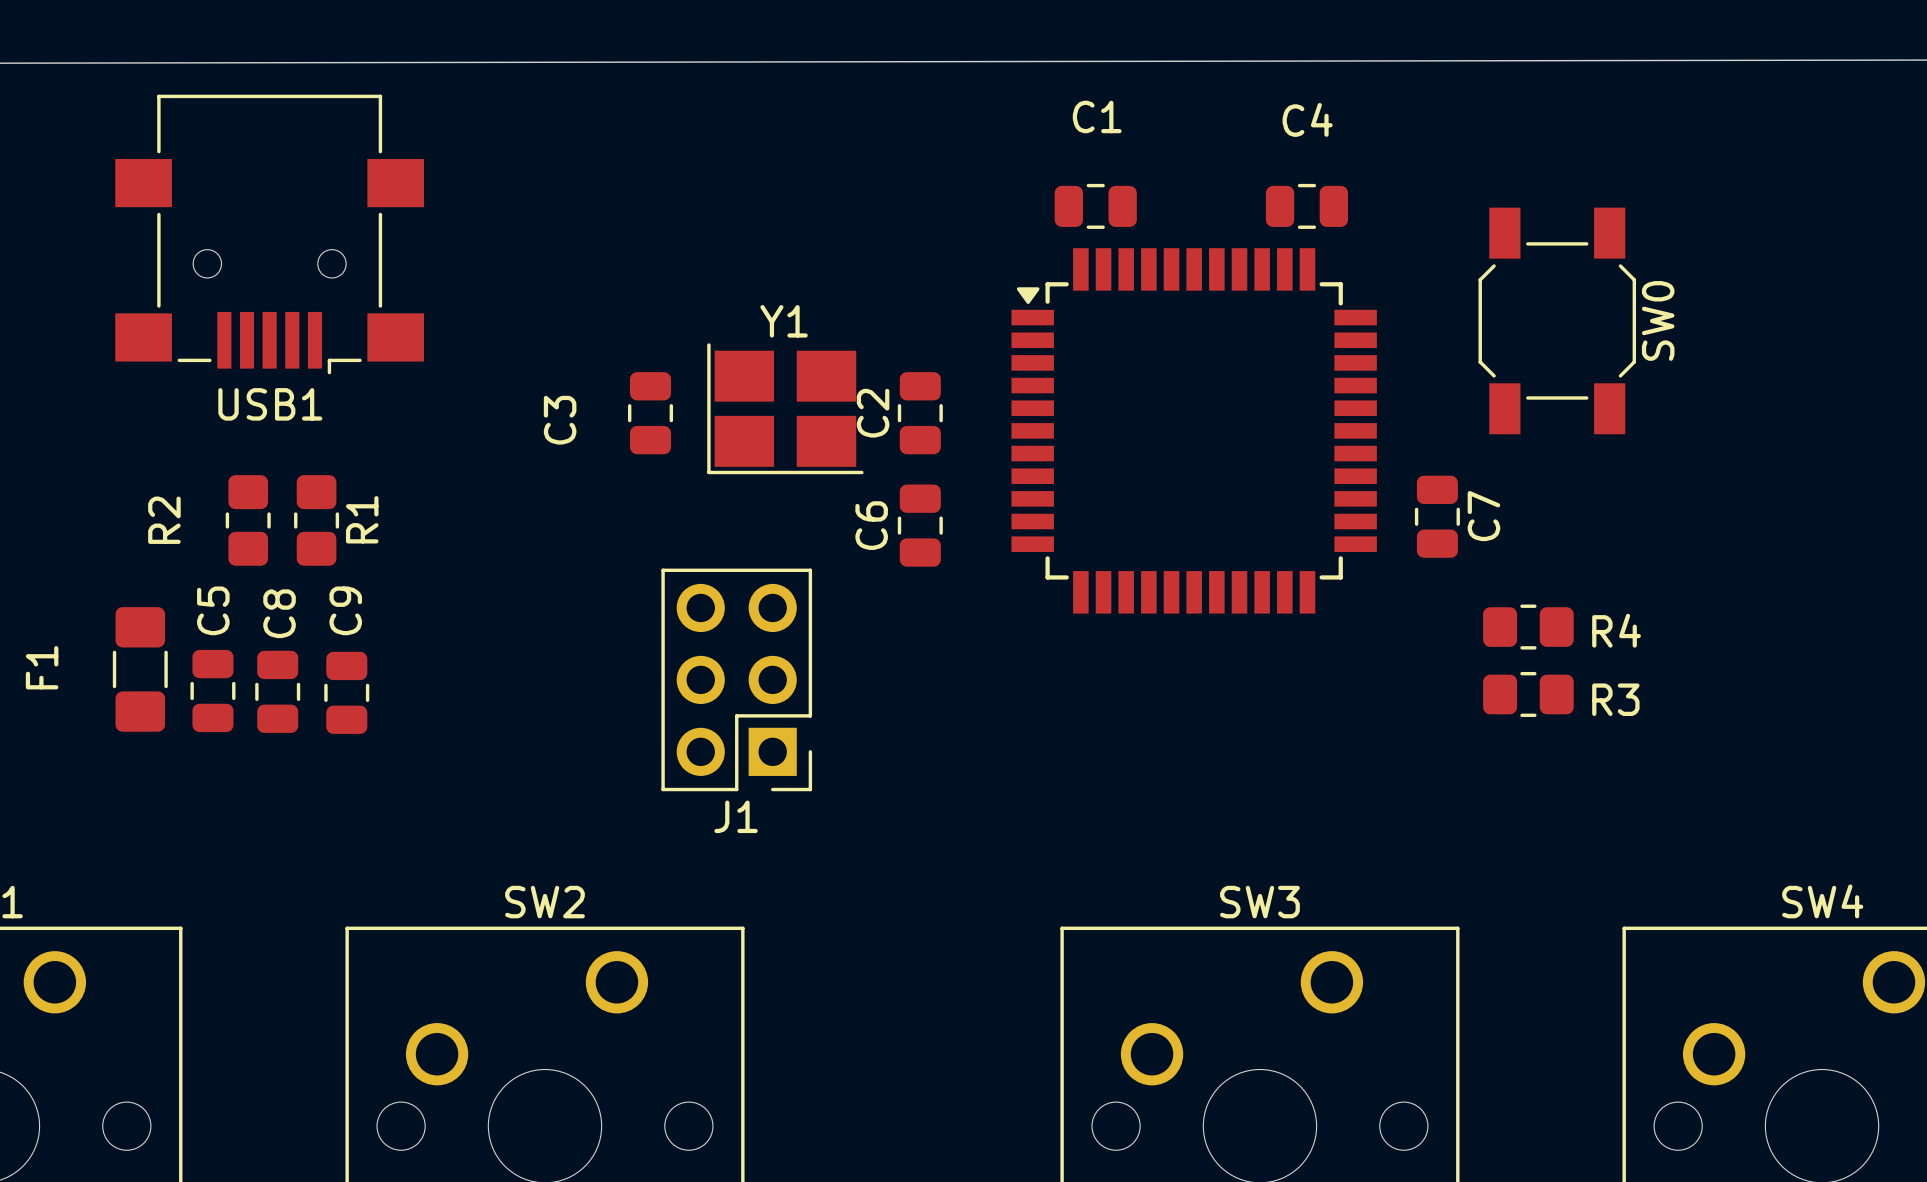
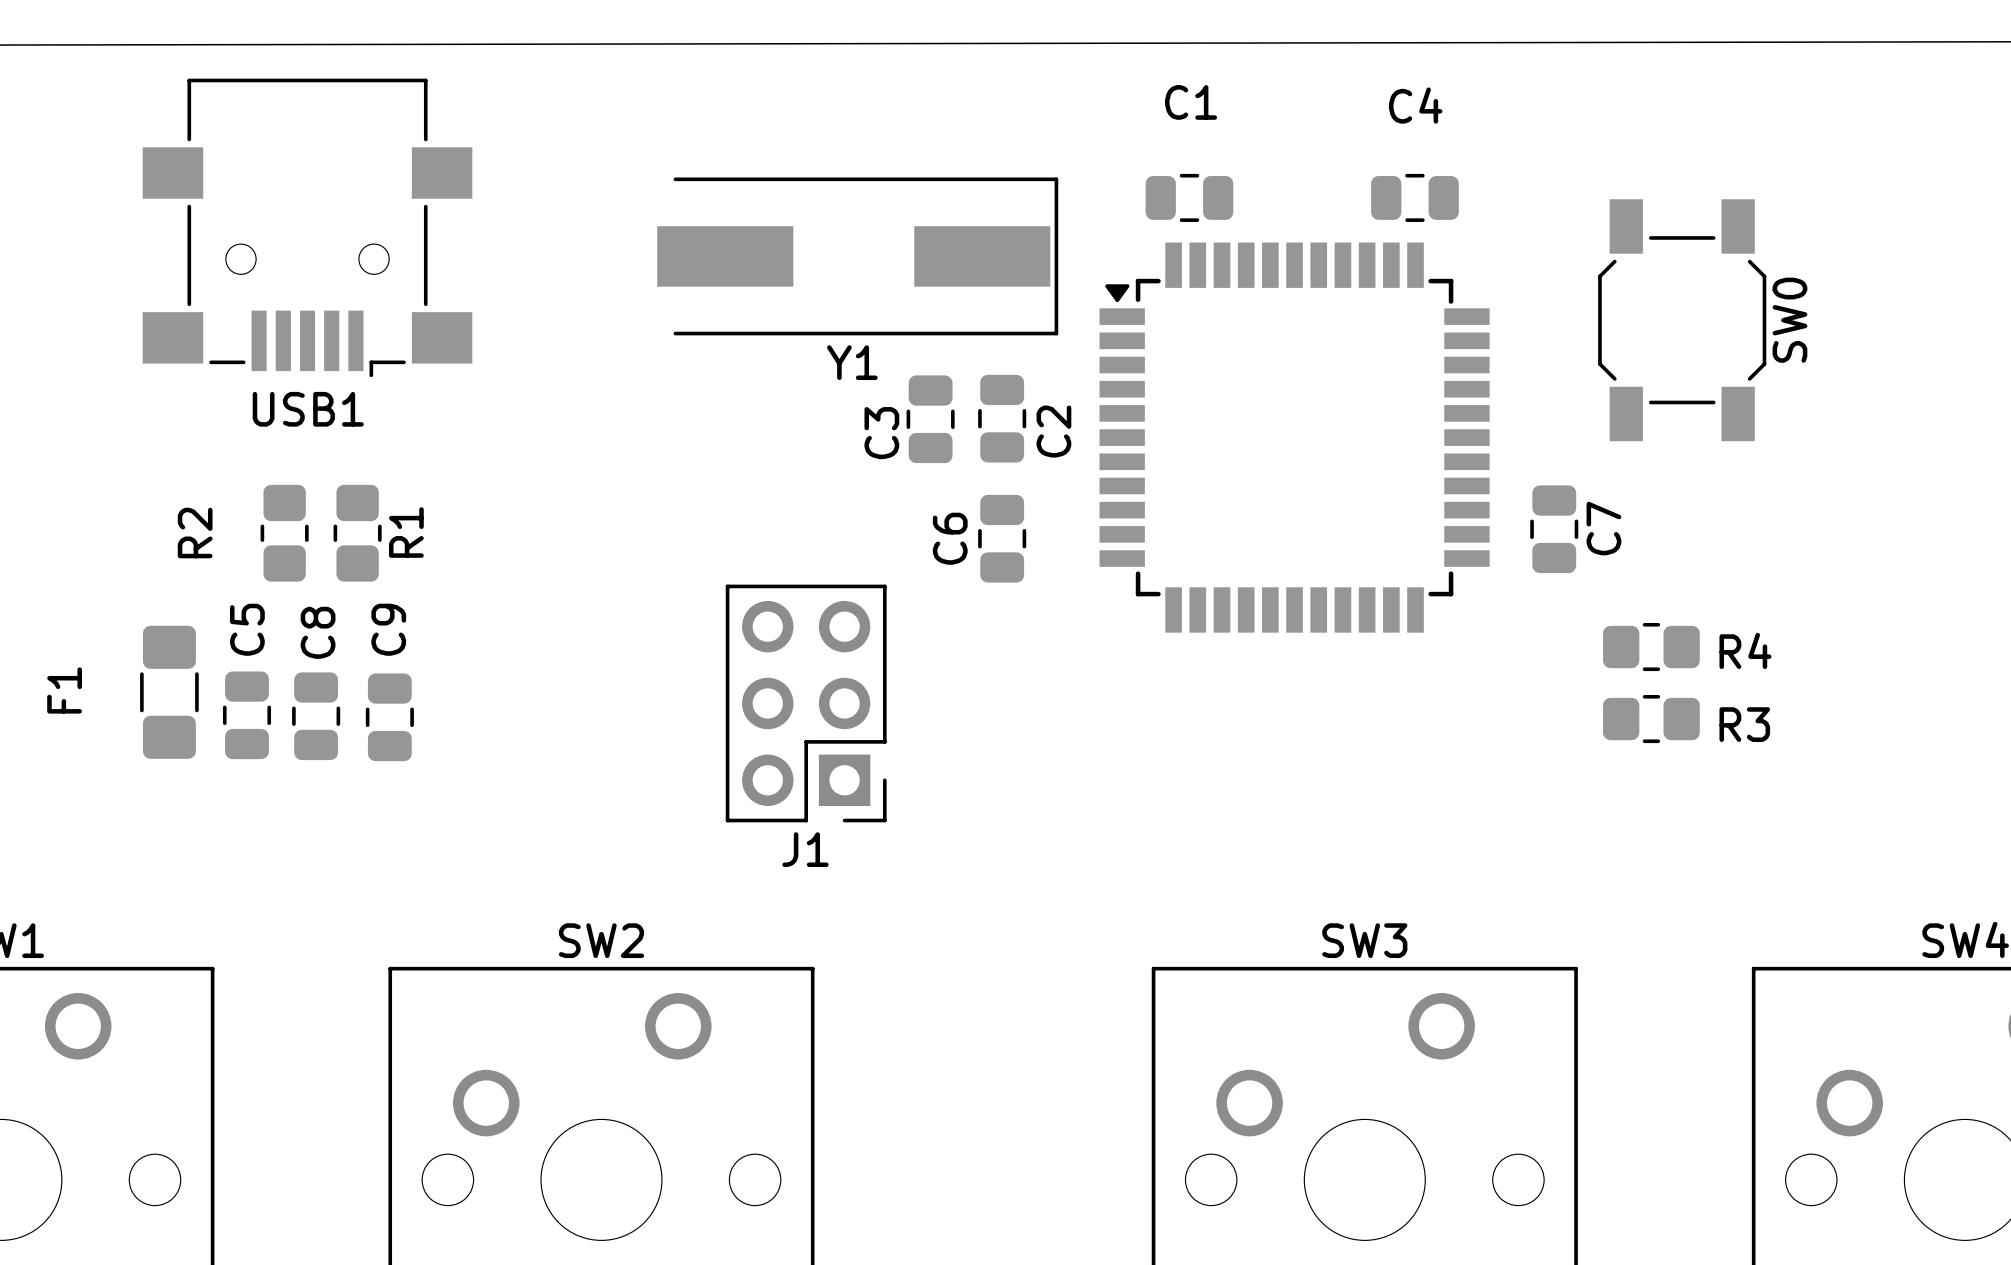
Y1 name position: Y1 (784, 321) -> Y1 (852, 362)
Y1 footprint: [707, 343, 864, 475] -> [657, 177, 1059, 336]
C3 position: (650, 413) -> (930, 419)
C2 name position: C2 (873, 413) -> C2 (1053, 431)
C3 name position: C3 (560, 420) -> C3 (881, 433)

